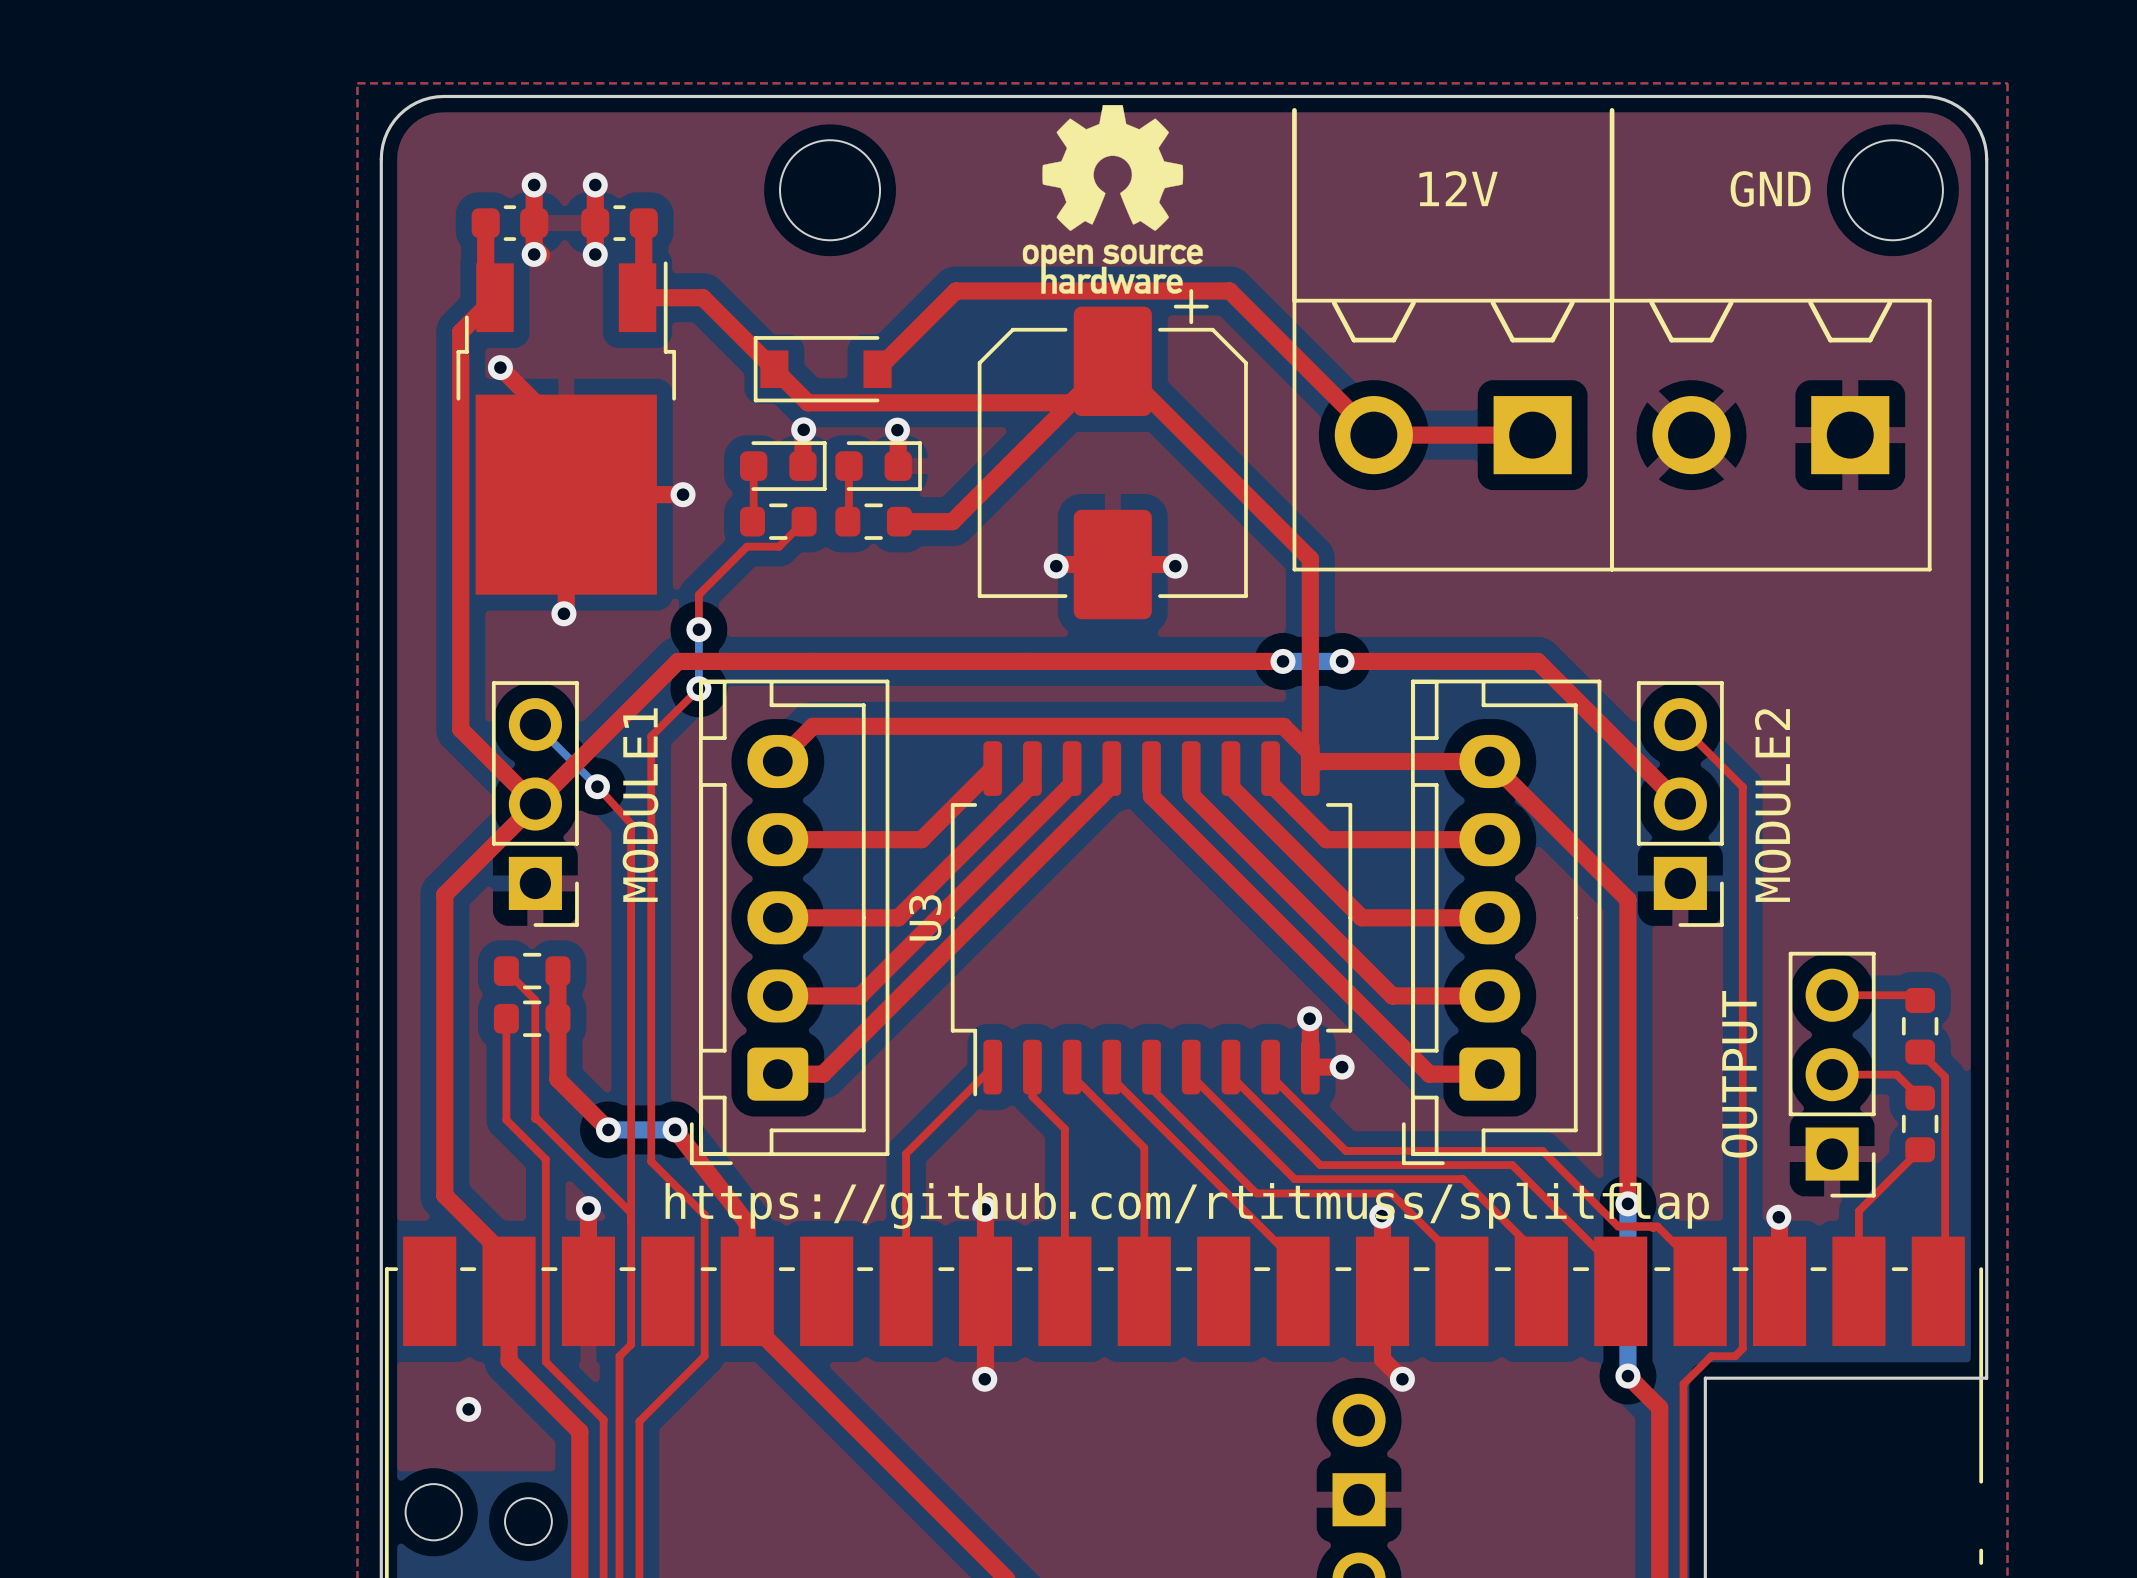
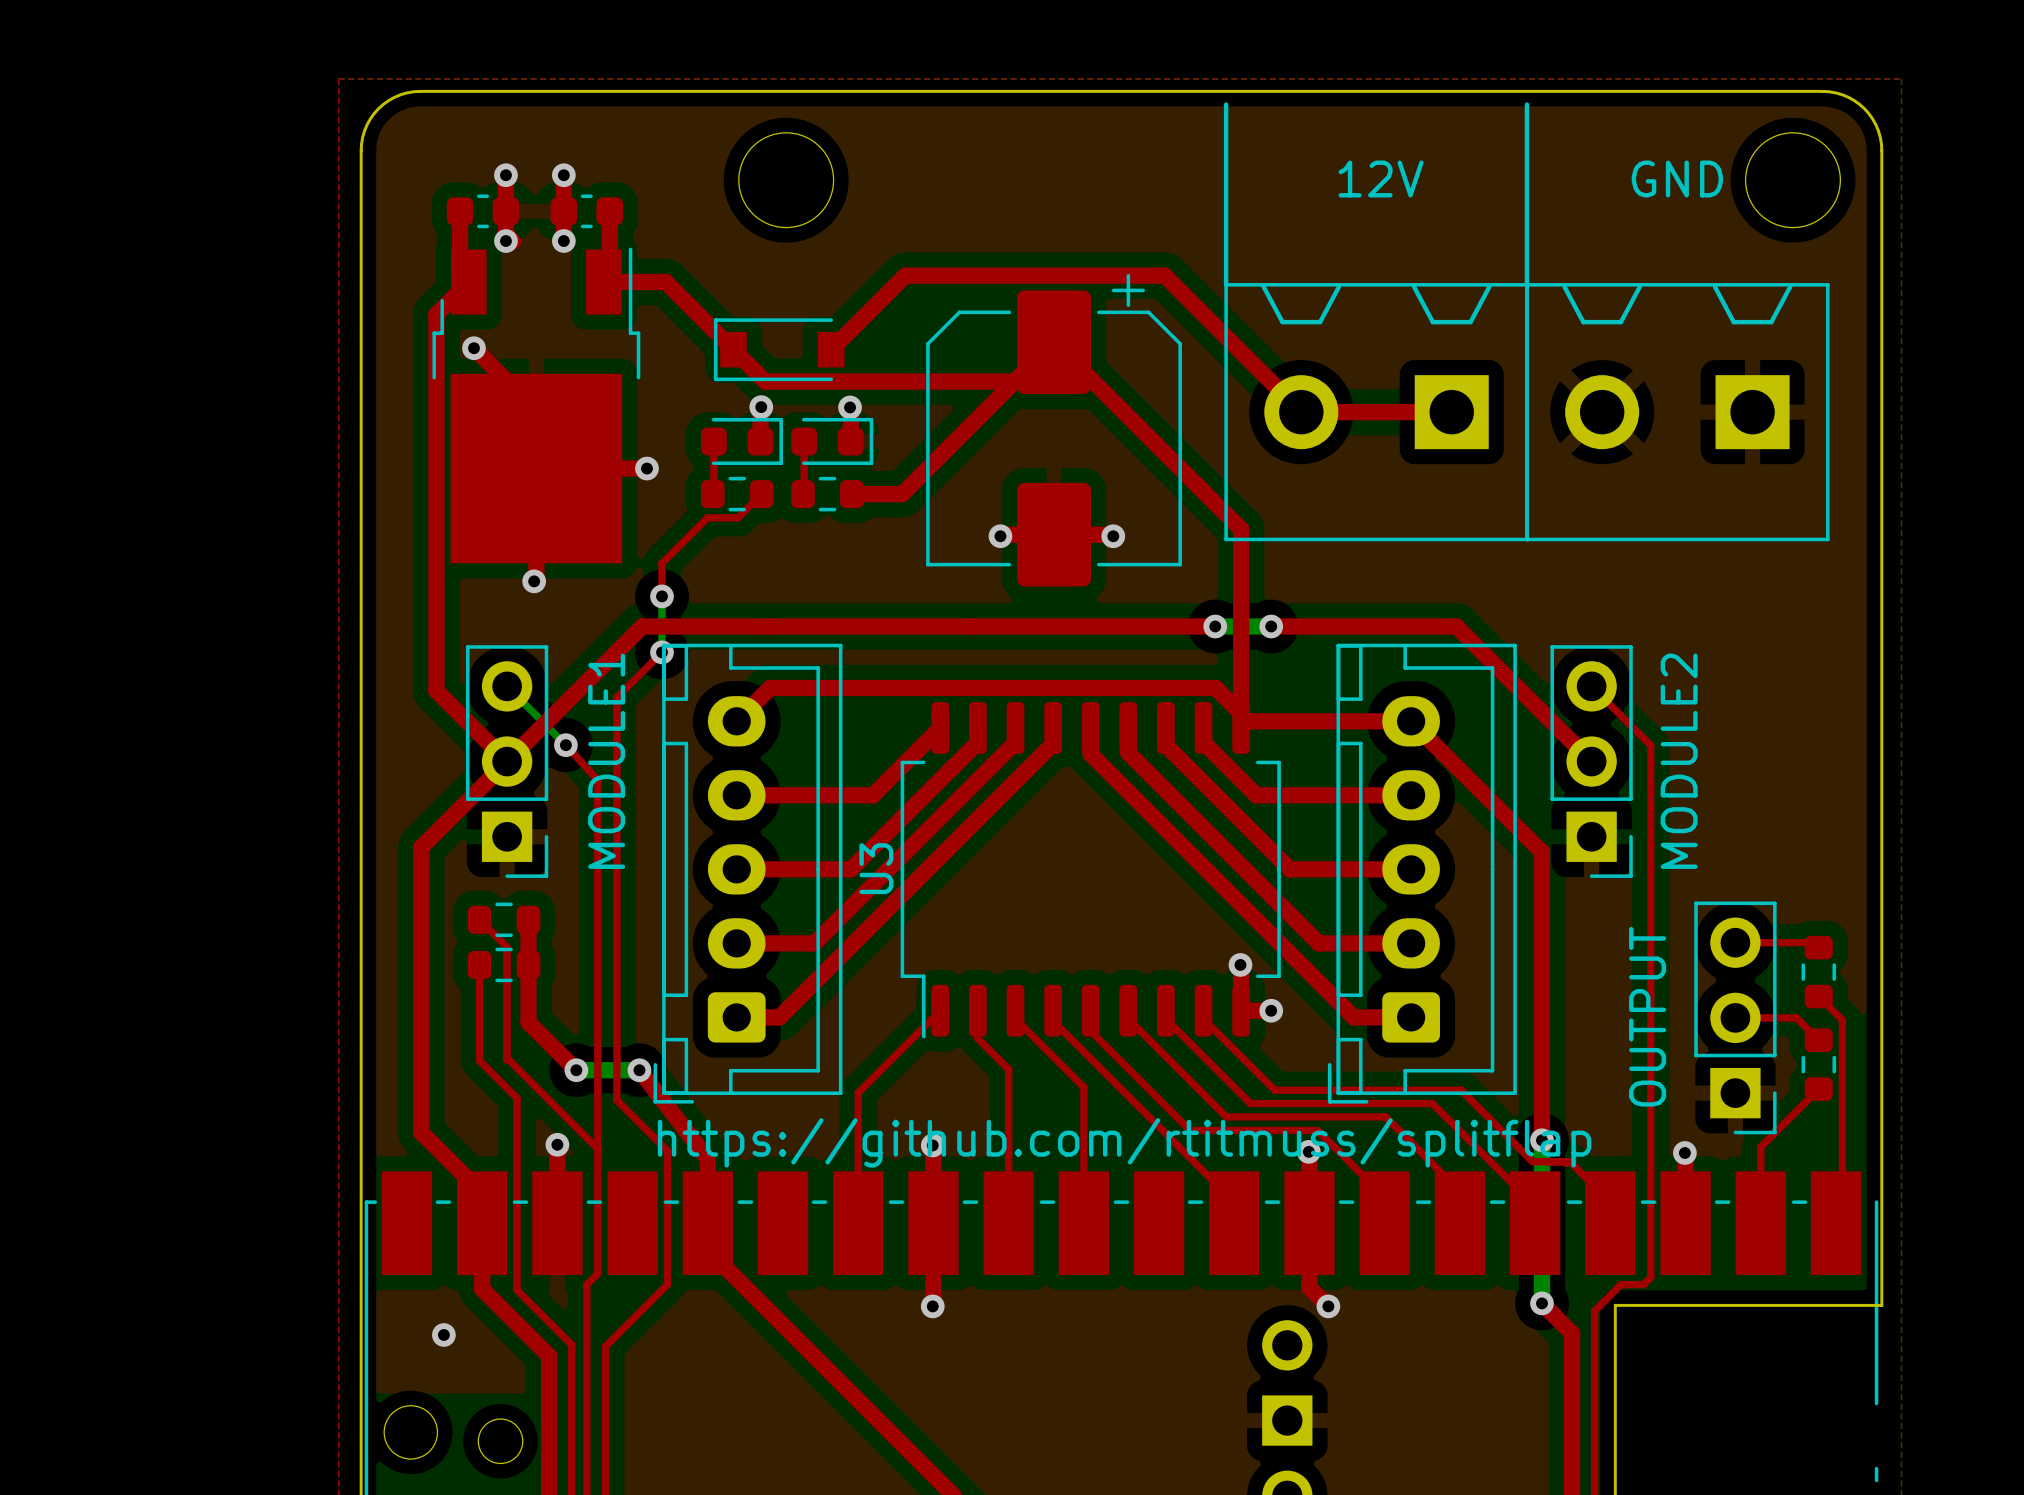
drawing: [1022, 104, 1203, 294] -> none

